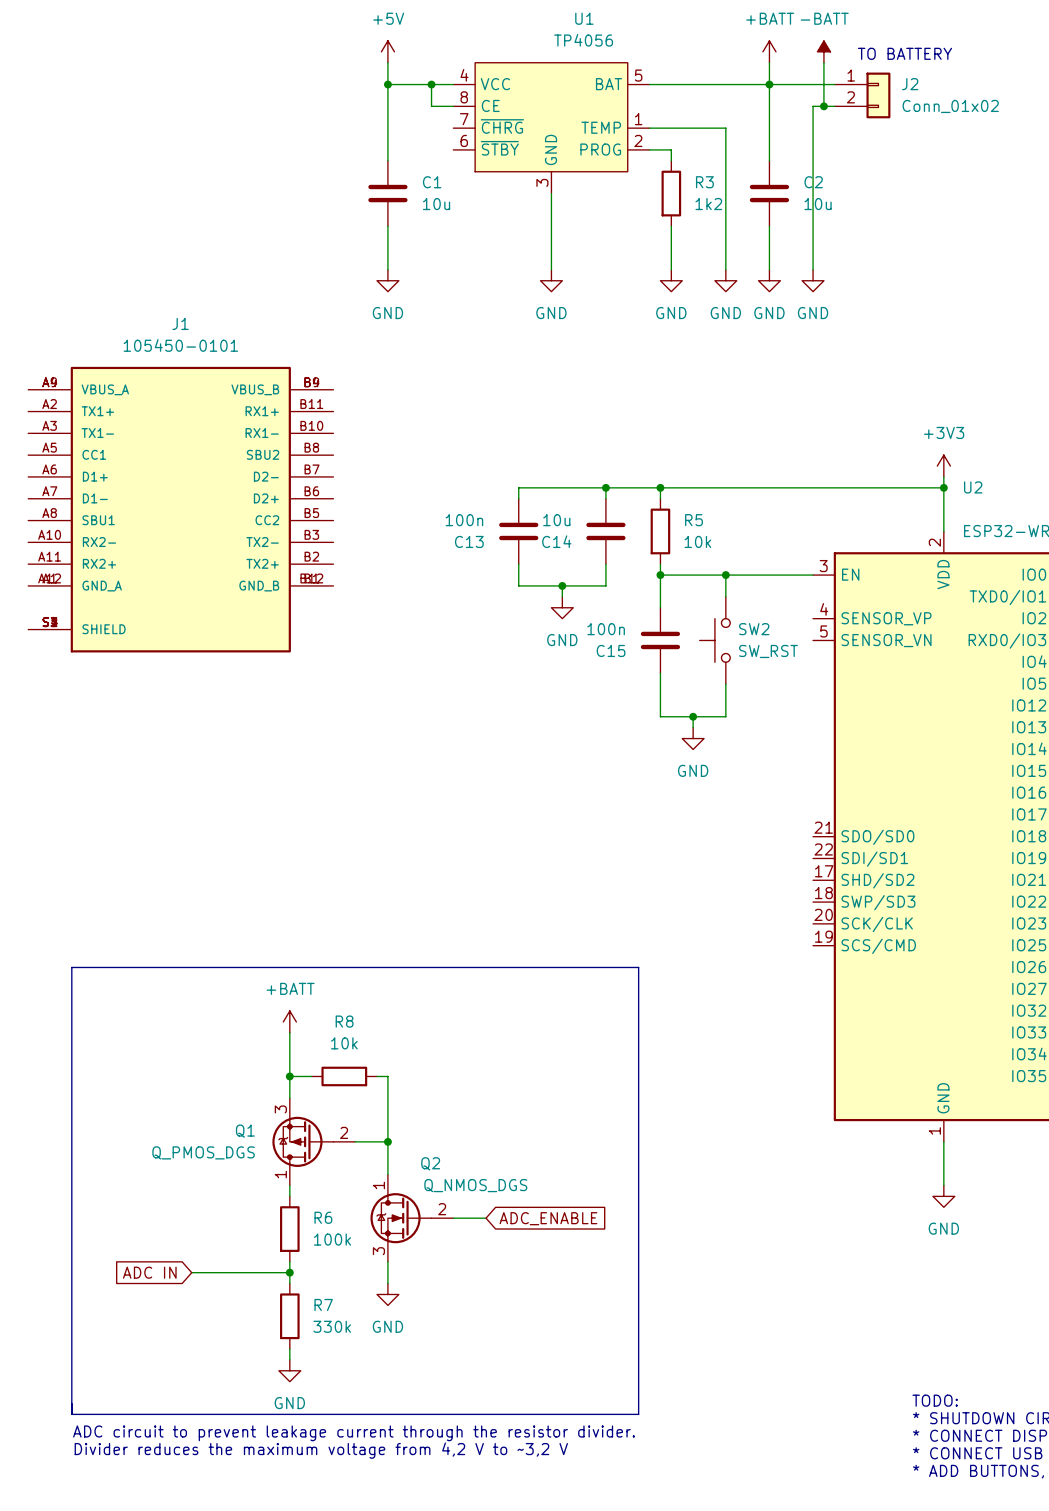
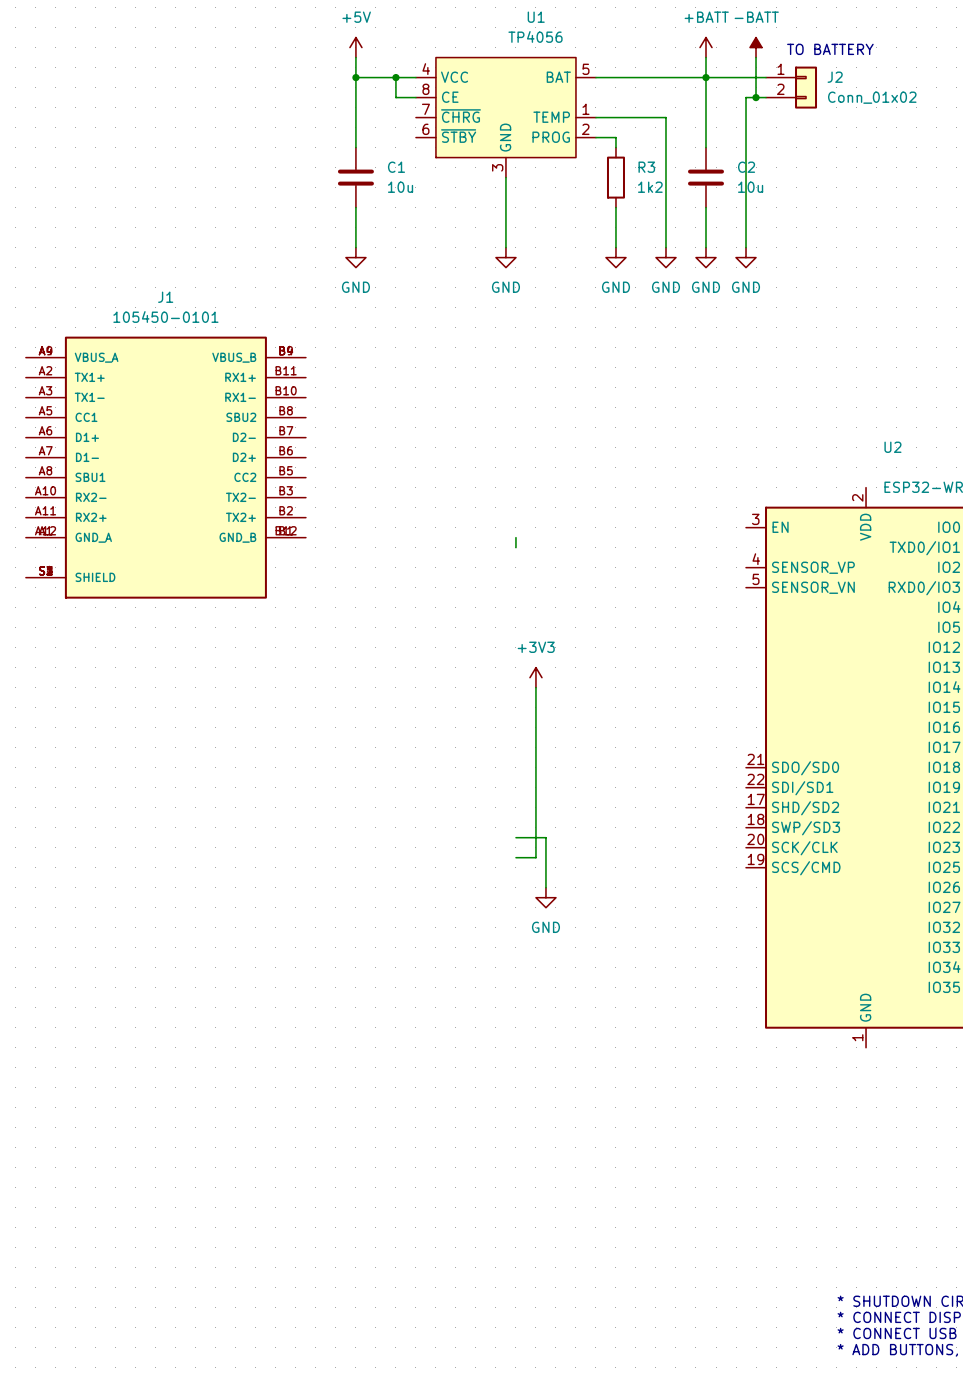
power symbol: +3V3 (943, 466) -> none
wire: (943, 476) (943, 531) -> none
wire: (605, 487) (605, 498) -> none
junction: (605, 487) -> none
wire: (660, 487) (660, 498) -> none
junction: (660, 487) -> none
wire: (943, 487) (518, 487) (518, 498) -> none
junction: (943, 487) -> none
C13: 100n (518, 531) -> none
C14: 10u (605, 531) -> none
R5: 10k (660, 531) -> none
wire: (518, 564) (518, 585) (605, 585) (605, 564) -> none
wire: (660, 564) (660, 607) -> none
wire: (660, 575) (813, 575) -> none
junction: (660, 575) -> none
wire: (725, 575) (725, 596) -> none
junction: (725, 575) -> none
junction: (562, 585) -> none
power symbol: GND (562, 607) -> none
C15: 100n (660, 640) -> none
SW2: SW_RST (714, 640) -> none
wire: (660, 673) (660, 716) (725, 716) (725, 684) -> none
wire: (693, 716) (693, 727) -> none
junction: (693, 716) -> none
power symbol: none -> +3V3 (535, 677)
power symbol: GND (693, 738) -> none
wire: none -> (535, 687) (535, 857) (515, 857)
wire: none -> (515, 837) (545, 837) (545, 887)
line: (71, 967) (71, 1414) (638, 1414) (638, 967) (71, 967) -> none
power symbol: none -> GND (545, 897)
power symbol: +BATT (289, 1021) -> none
wire: (289, 1032) (289, 1098) -> none
wire: (289, 1076) (311, 1076) -> none
junction: (289, 1076) -> none
R8: 10k (344, 1076) -> none
wire: (377, 1076) (387, 1076) (387, 1174) -> none
Q1: Q_PMOS_DGS (313, 1141) -> none
wire: (355, 1141) (387, 1141) -> none
junction: (387, 1141) -> none
wire: (943, 1141) (943, 1185) -> none
wire: (289, 1185) (289, 1196) -> none
power symbol: GND (943, 1196) -> none
Q2: Q_NMOS_DGS (411, 1218) -> none
wire: (453, 1218) (486, 1218) -> none
global label: ADC_ENABLE (548, 1218) -> none
R6: 100k (289, 1229) -> none
wire: (289, 1261) (289, 1283) -> none
wire: (387, 1261) (387, 1283) -> none
global label: ADC IN (149, 1272) -> none
wire: (191, 1272) (289, 1272) -> none
junction: (289, 1272) -> none
power symbol: GND (387, 1294) -> none
R7: 330k (289, 1316) -> none
wire: (289, 1348) (289, 1359) -> none
power symbol: GND (289, 1370) -> none
text: TODO: (935, 1400) -> none
text: ADC circuit to prevent leakage current through the resistor divider. (354, 1433) -> none
text: Divider reduces the maximum voltage from 4,2 V to ~3,2 V (321, 1450) -> none

